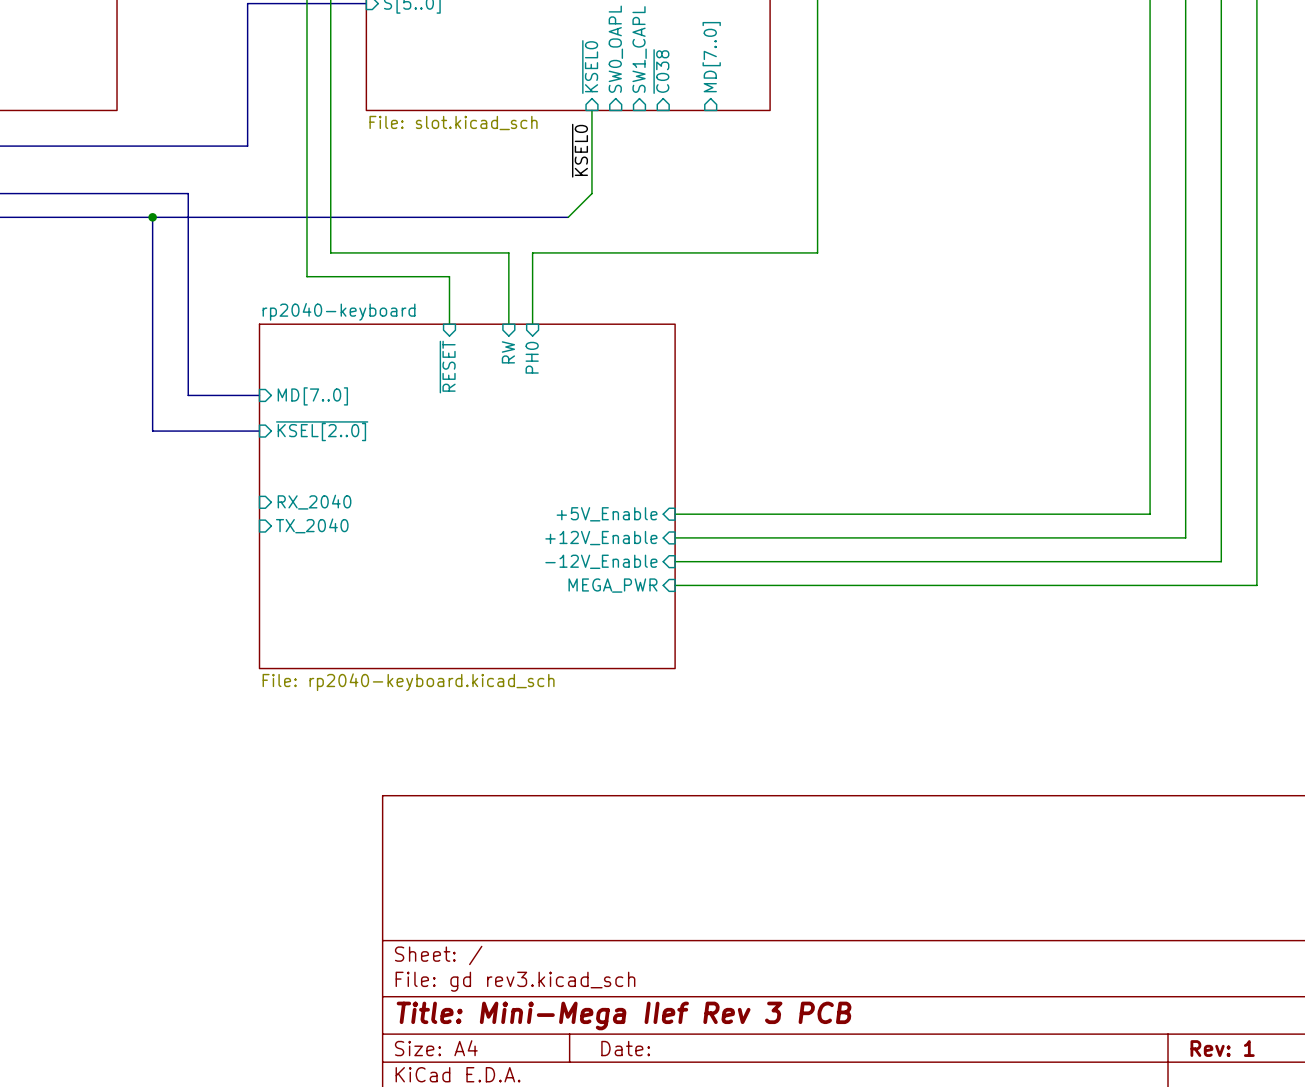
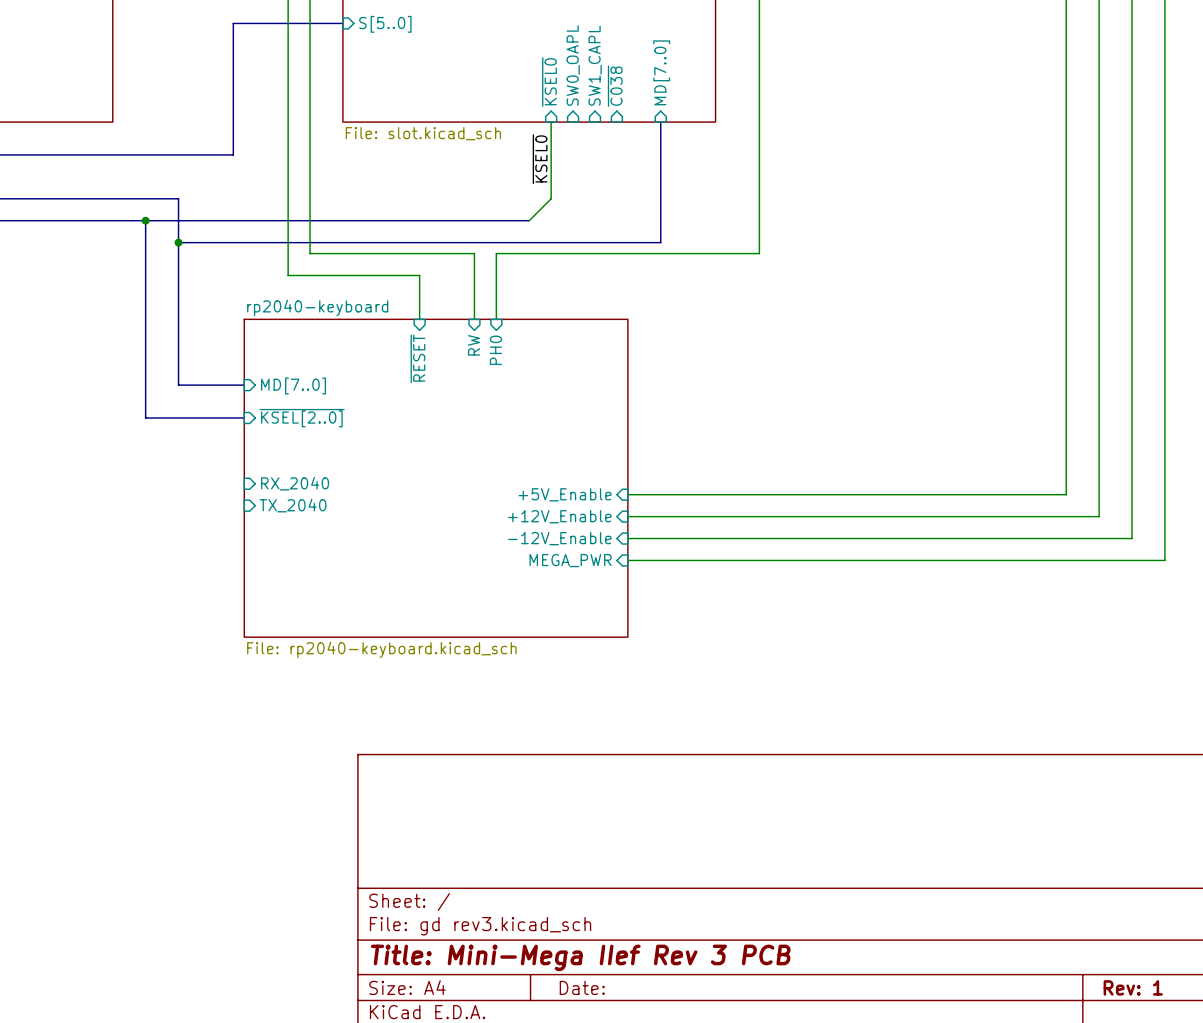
bus: none -> (660, 122) (660, 242) (178, 242)
junction: none -> (178, 242)

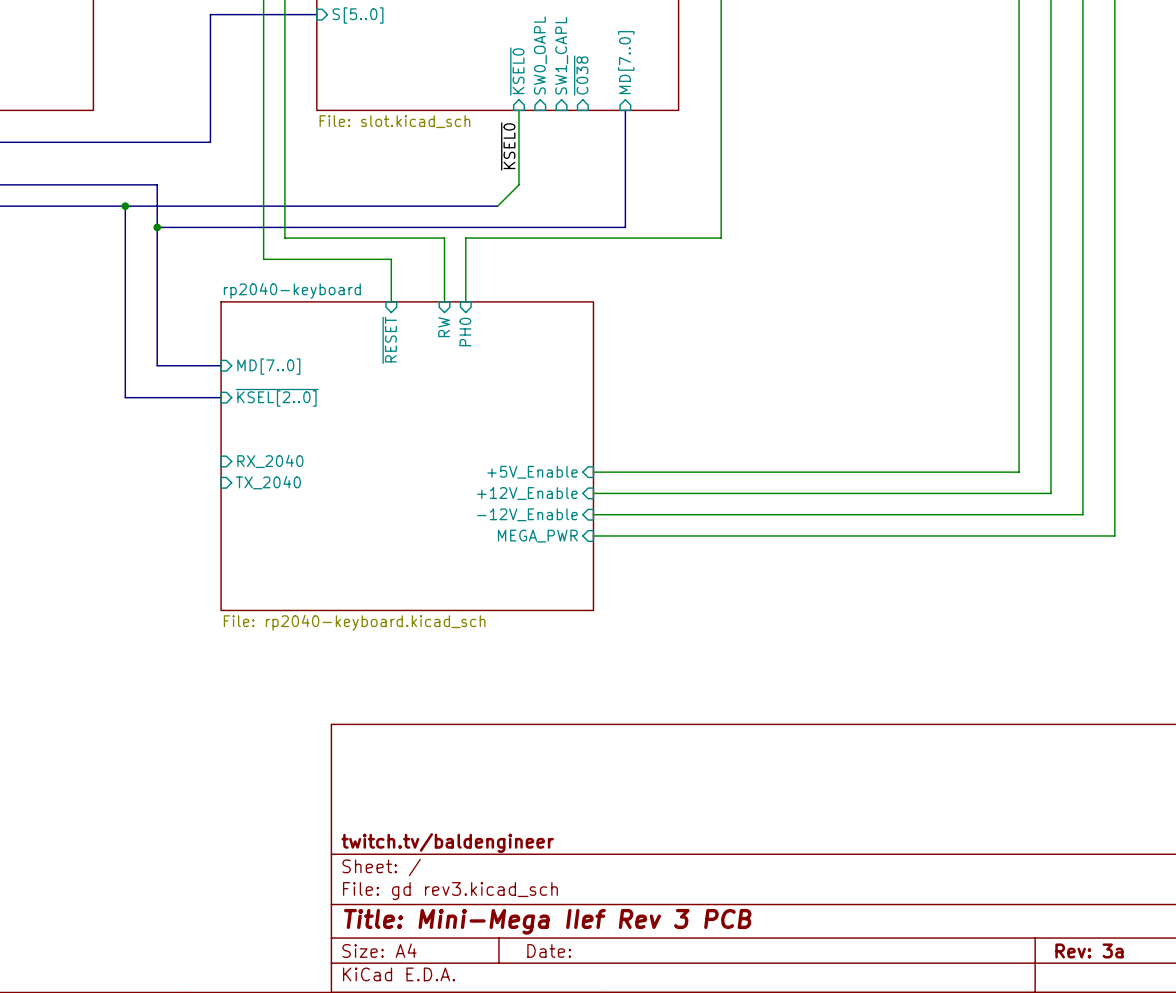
title block: none -> twitch.tv/baldengineer (447, 843)
title block: Rev: 1 (1133, 987) -> Rev: 3a (1089, 950)

